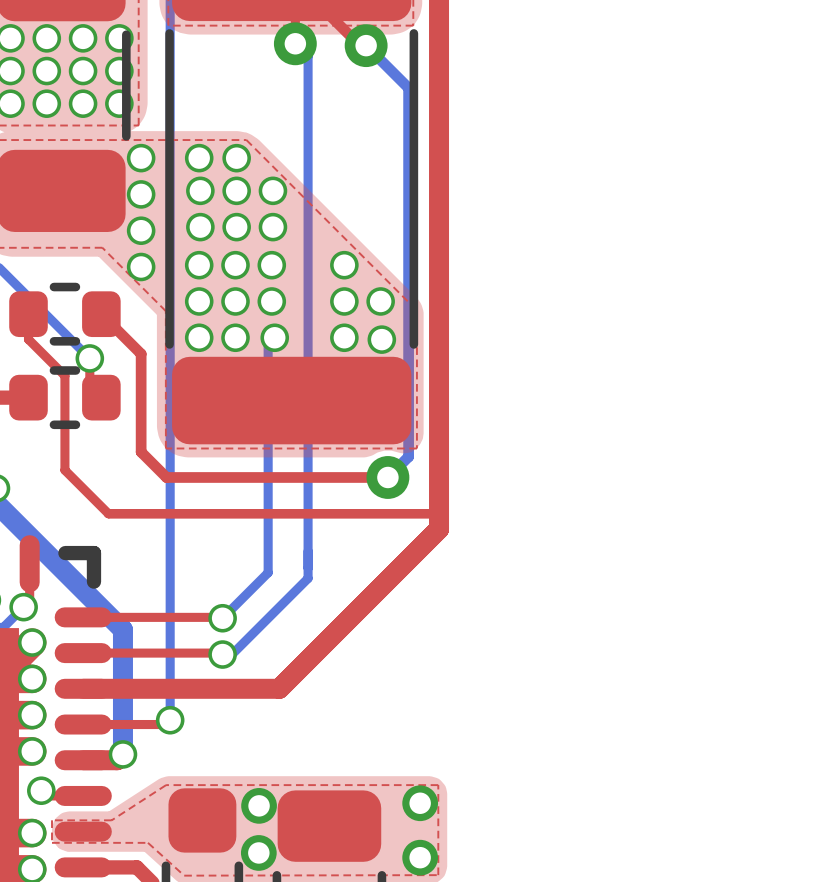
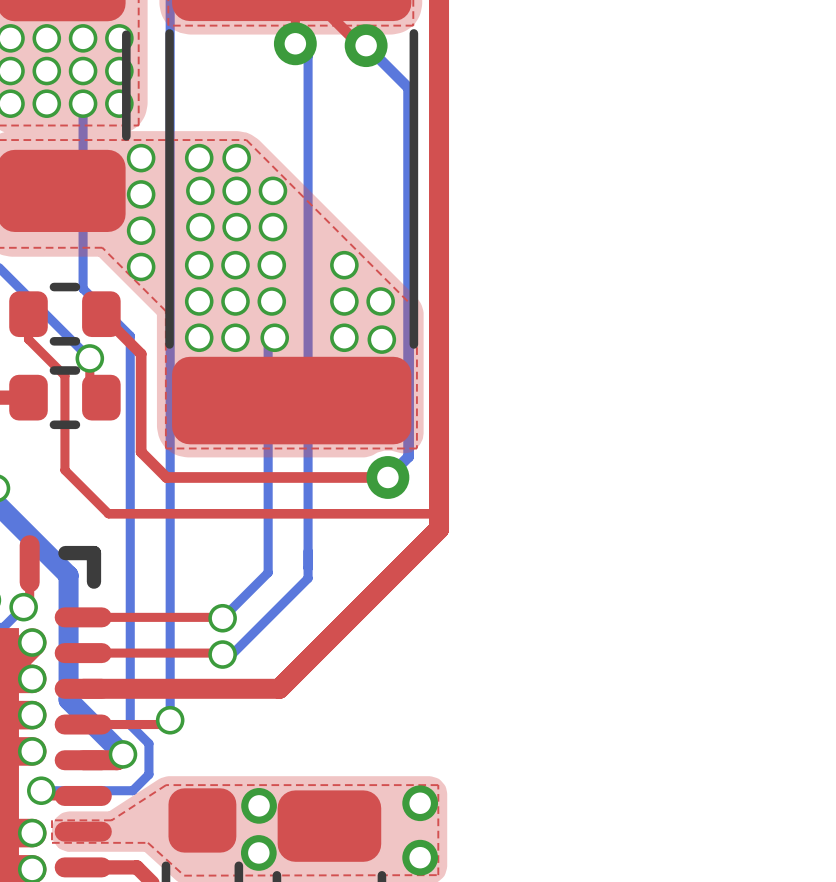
bottom track: none -> (83, 103) (83, 288) (130, 335) (130, 724) (148, 743) (148, 774) (132, 790) (41, 790)
bottom track: (68, 575) (122, 629) (122, 754) -> (68, 575) (68, 700) (122, 754)

